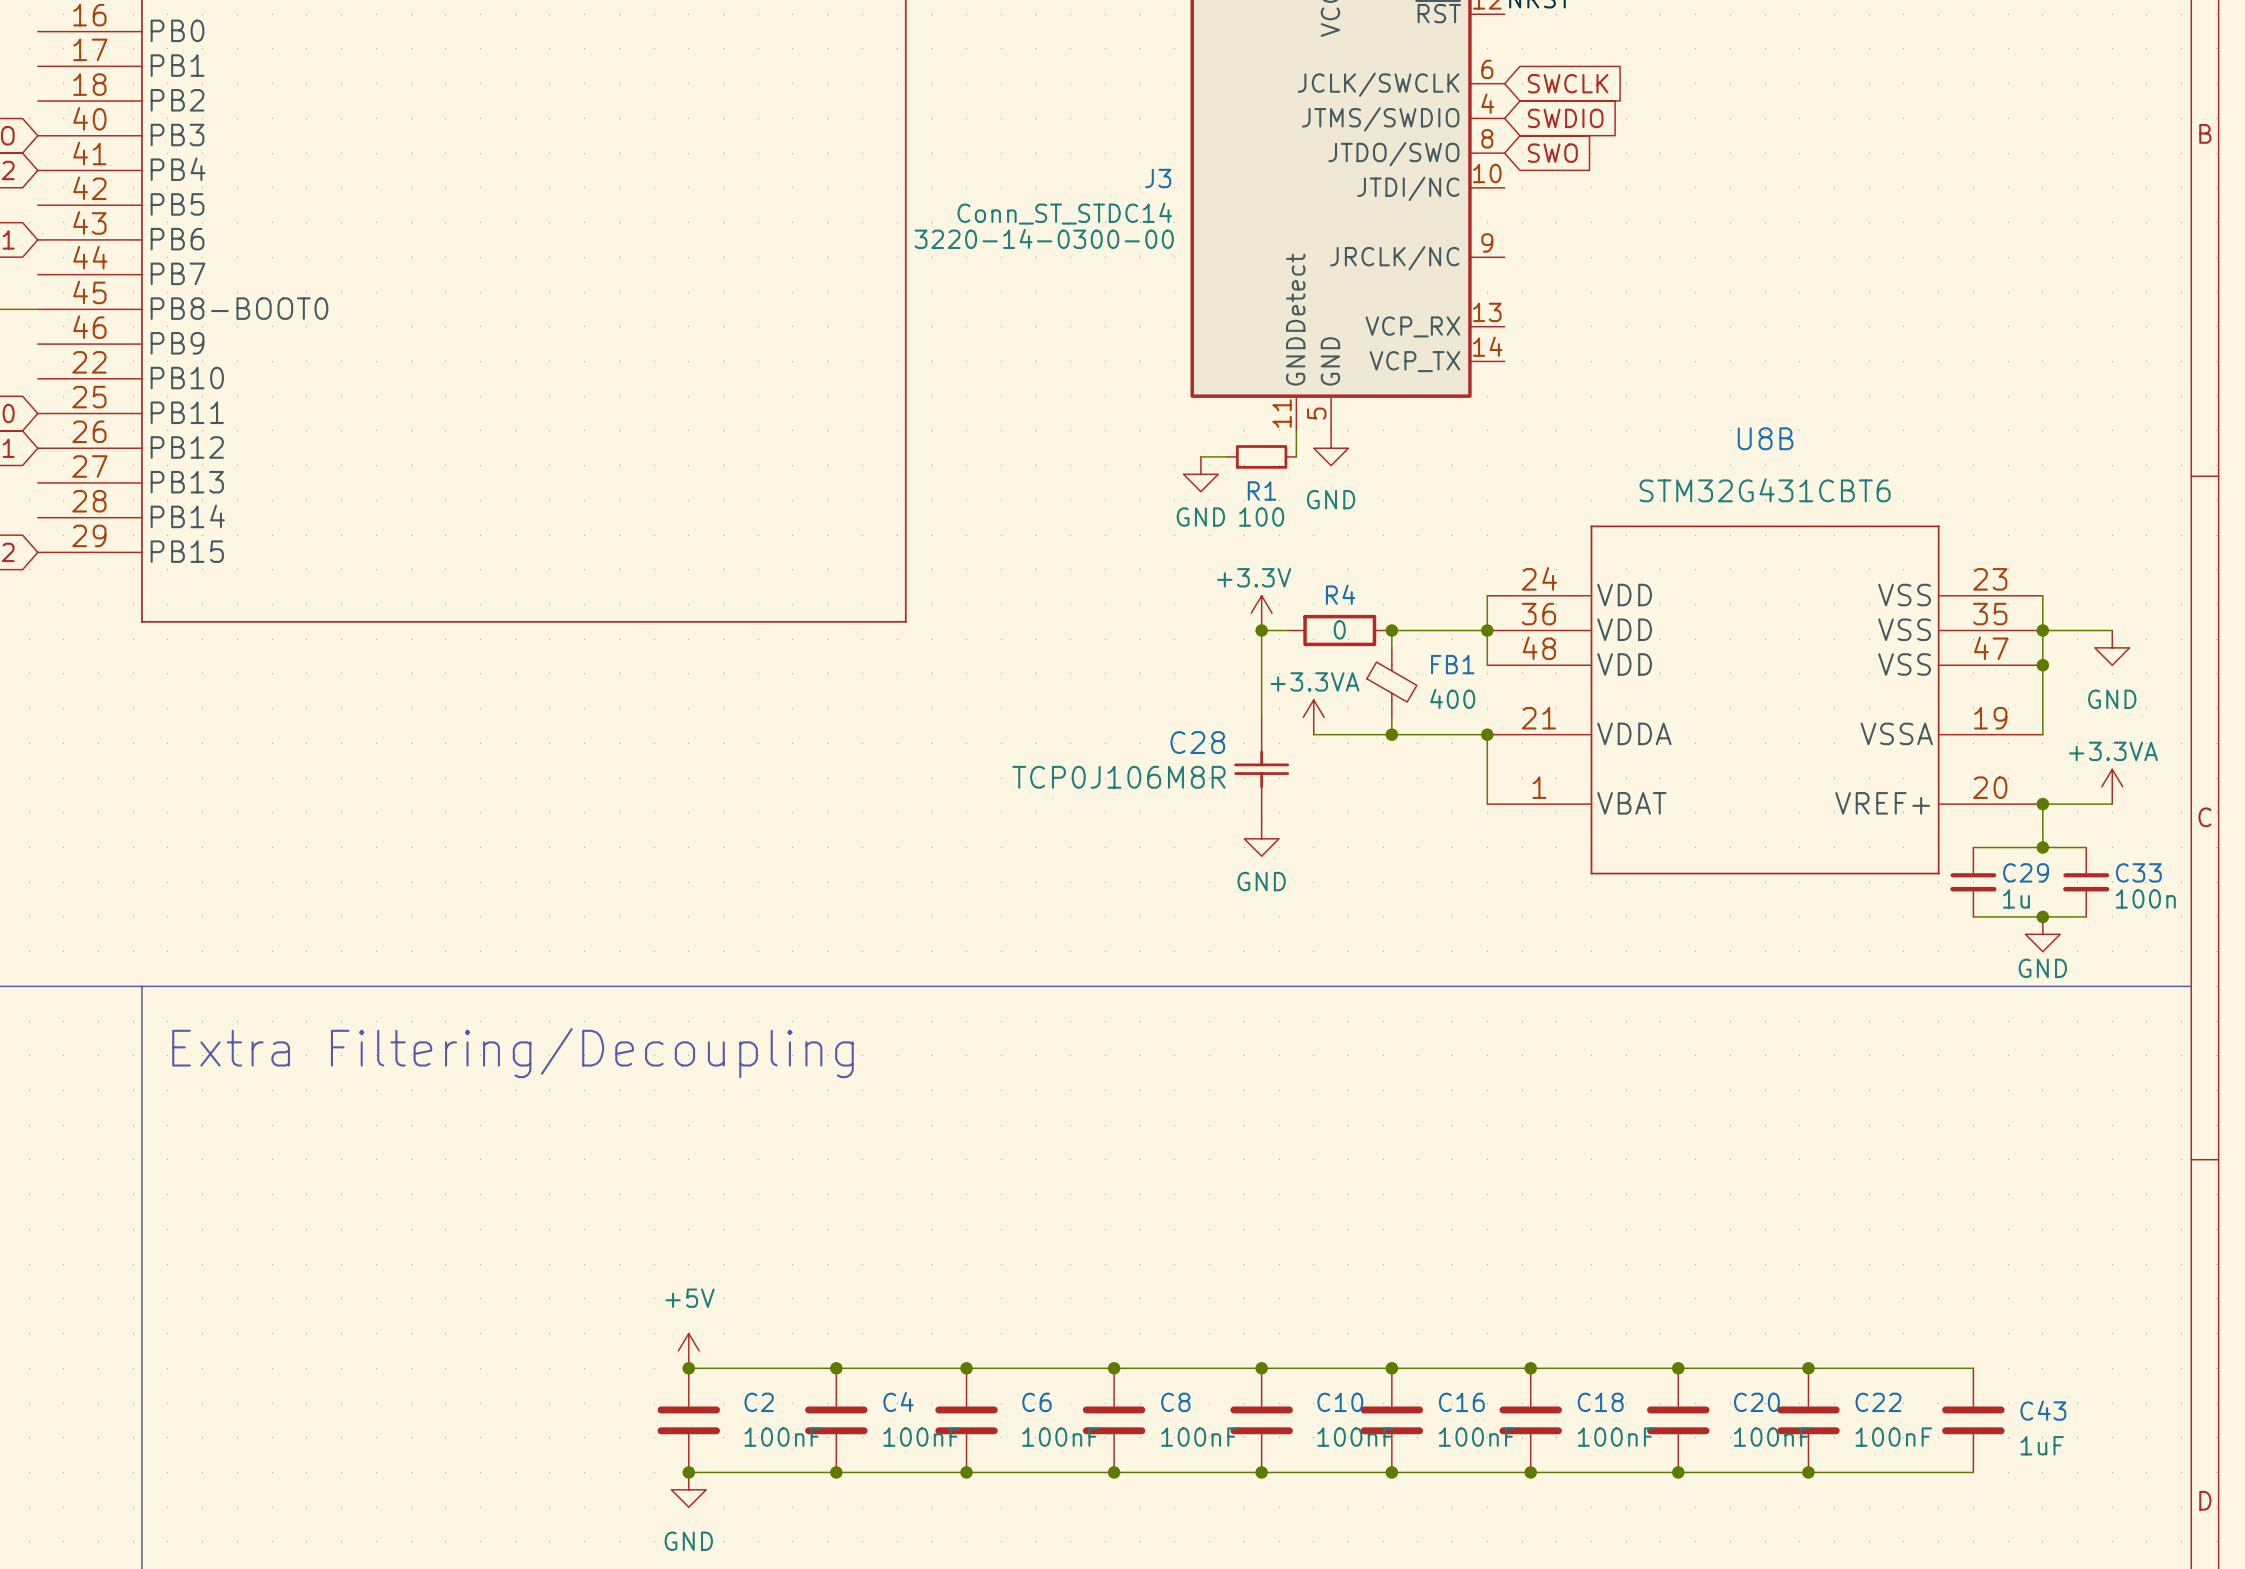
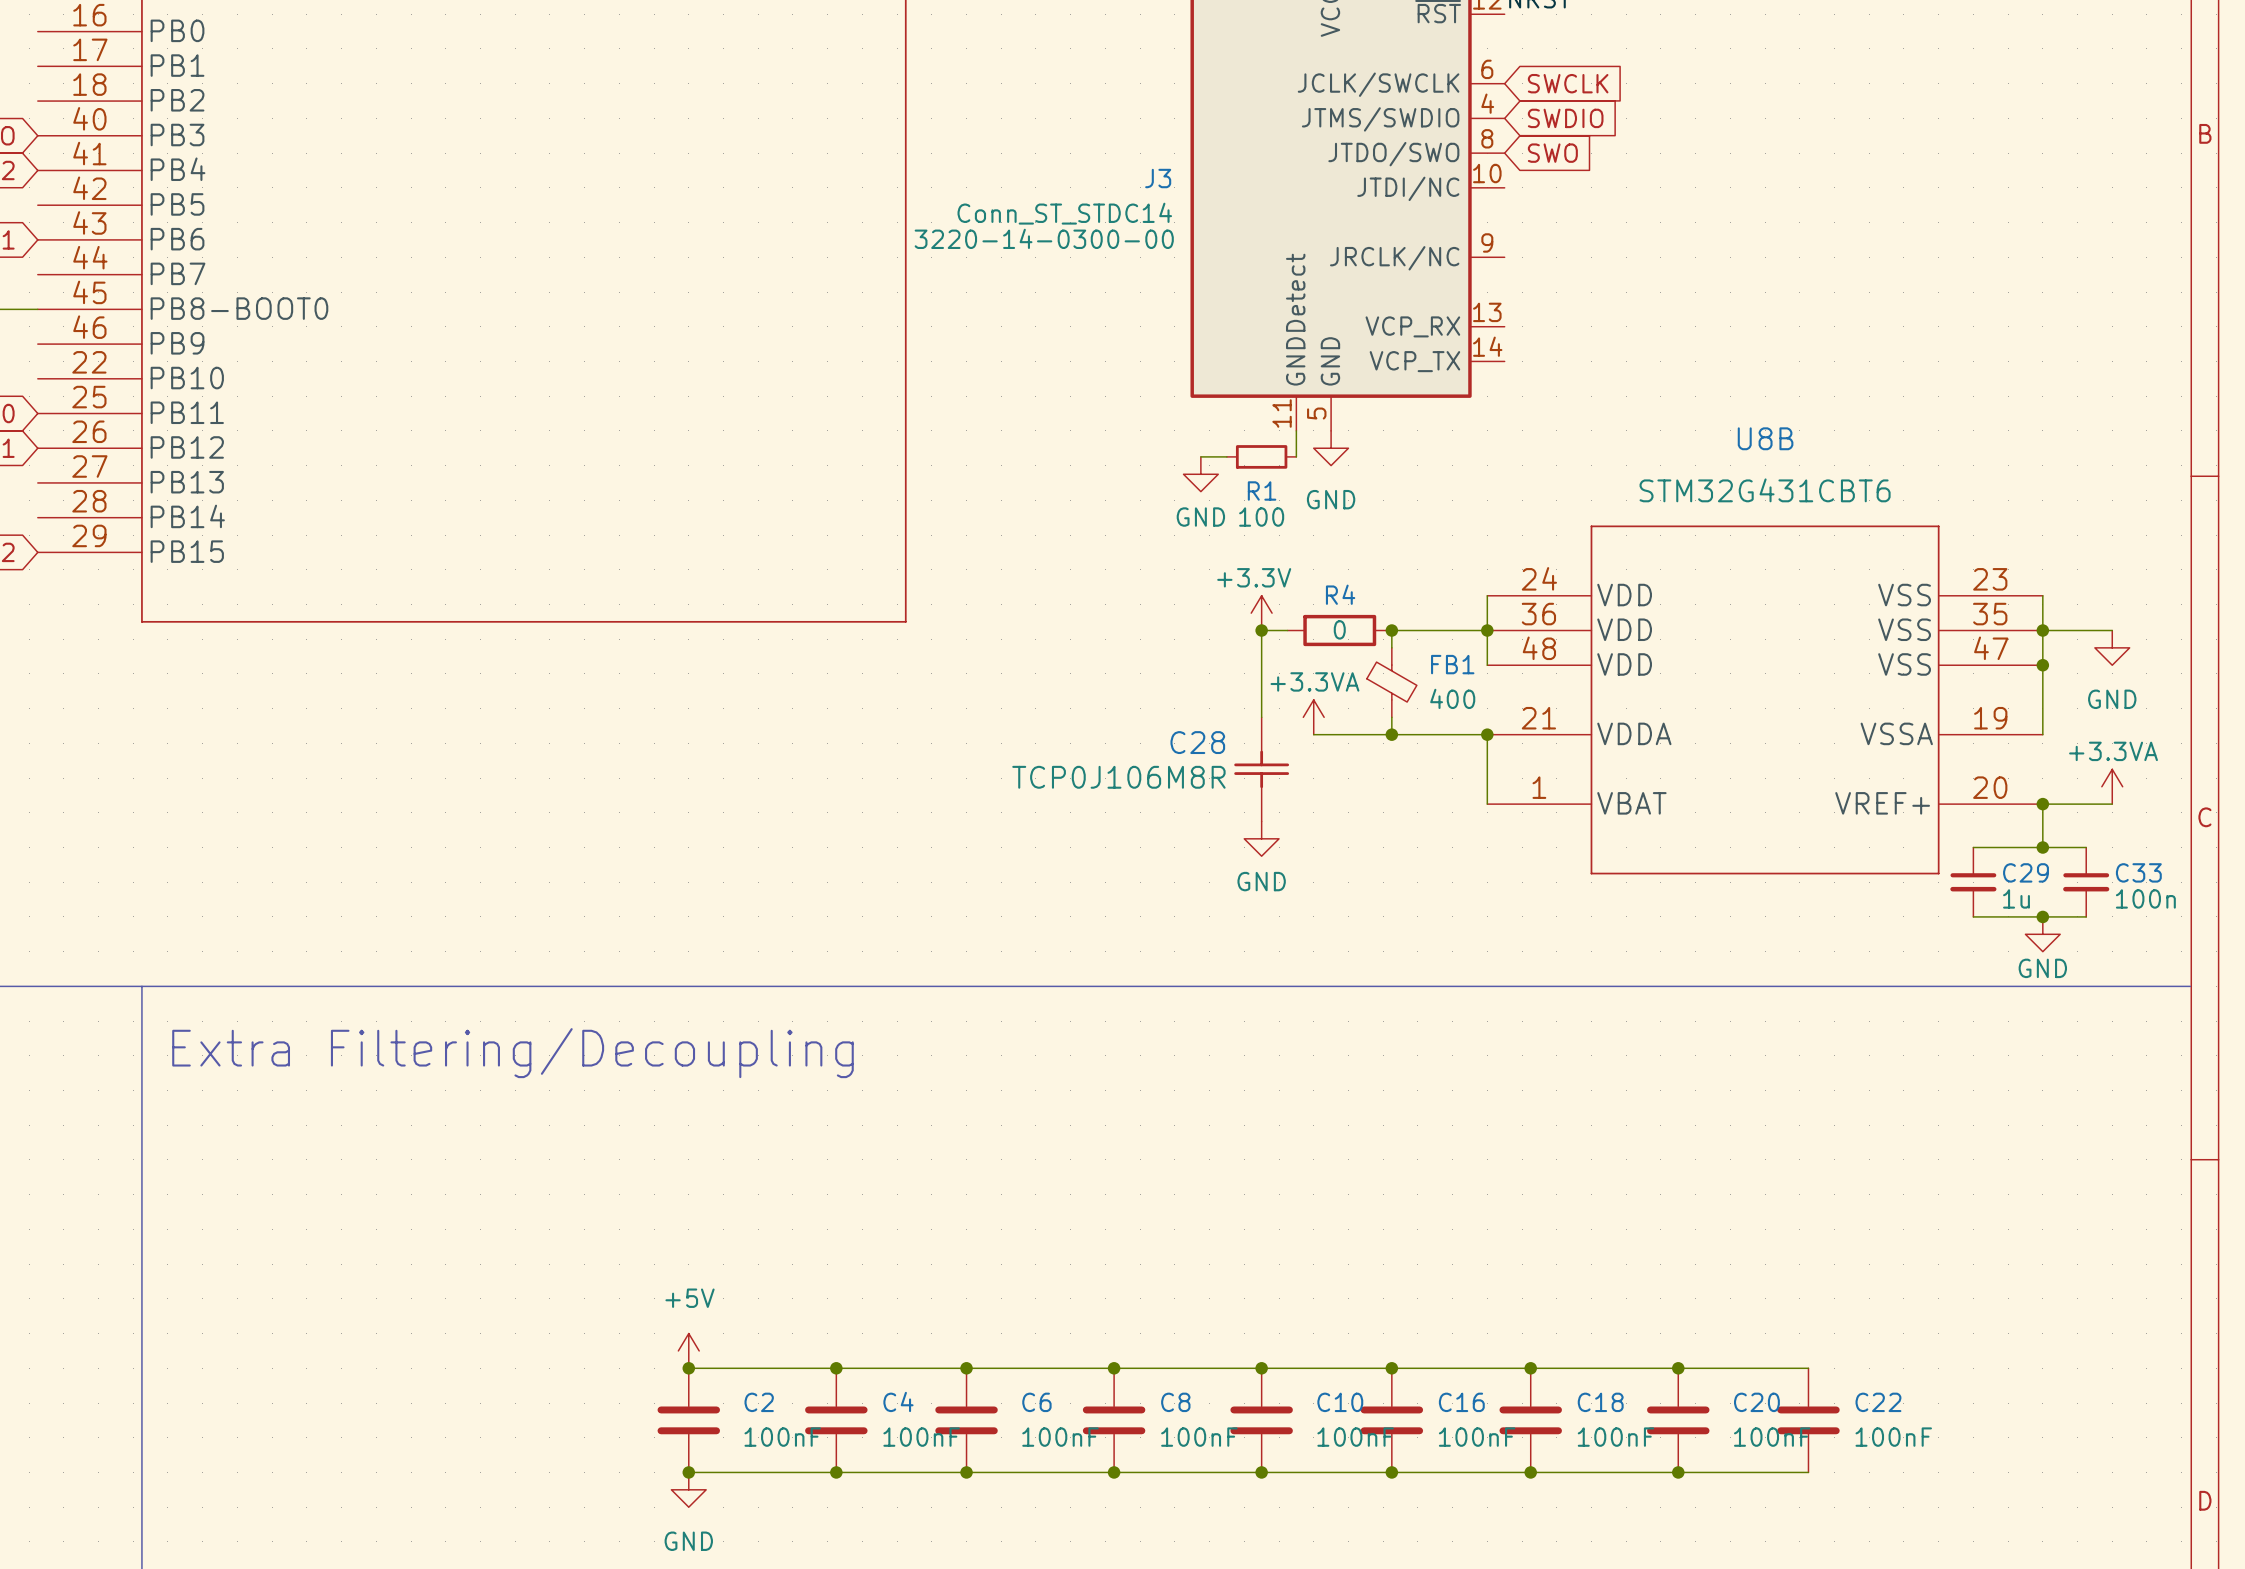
wire: (1808, 1368) (1973, 1368) -> none
junction: (1808, 1368) -> none
C43: 1uF (1973, 1420) -> none
wire: (1808, 1472) (1973, 1472) -> none
junction: (1808, 1472) -> none

